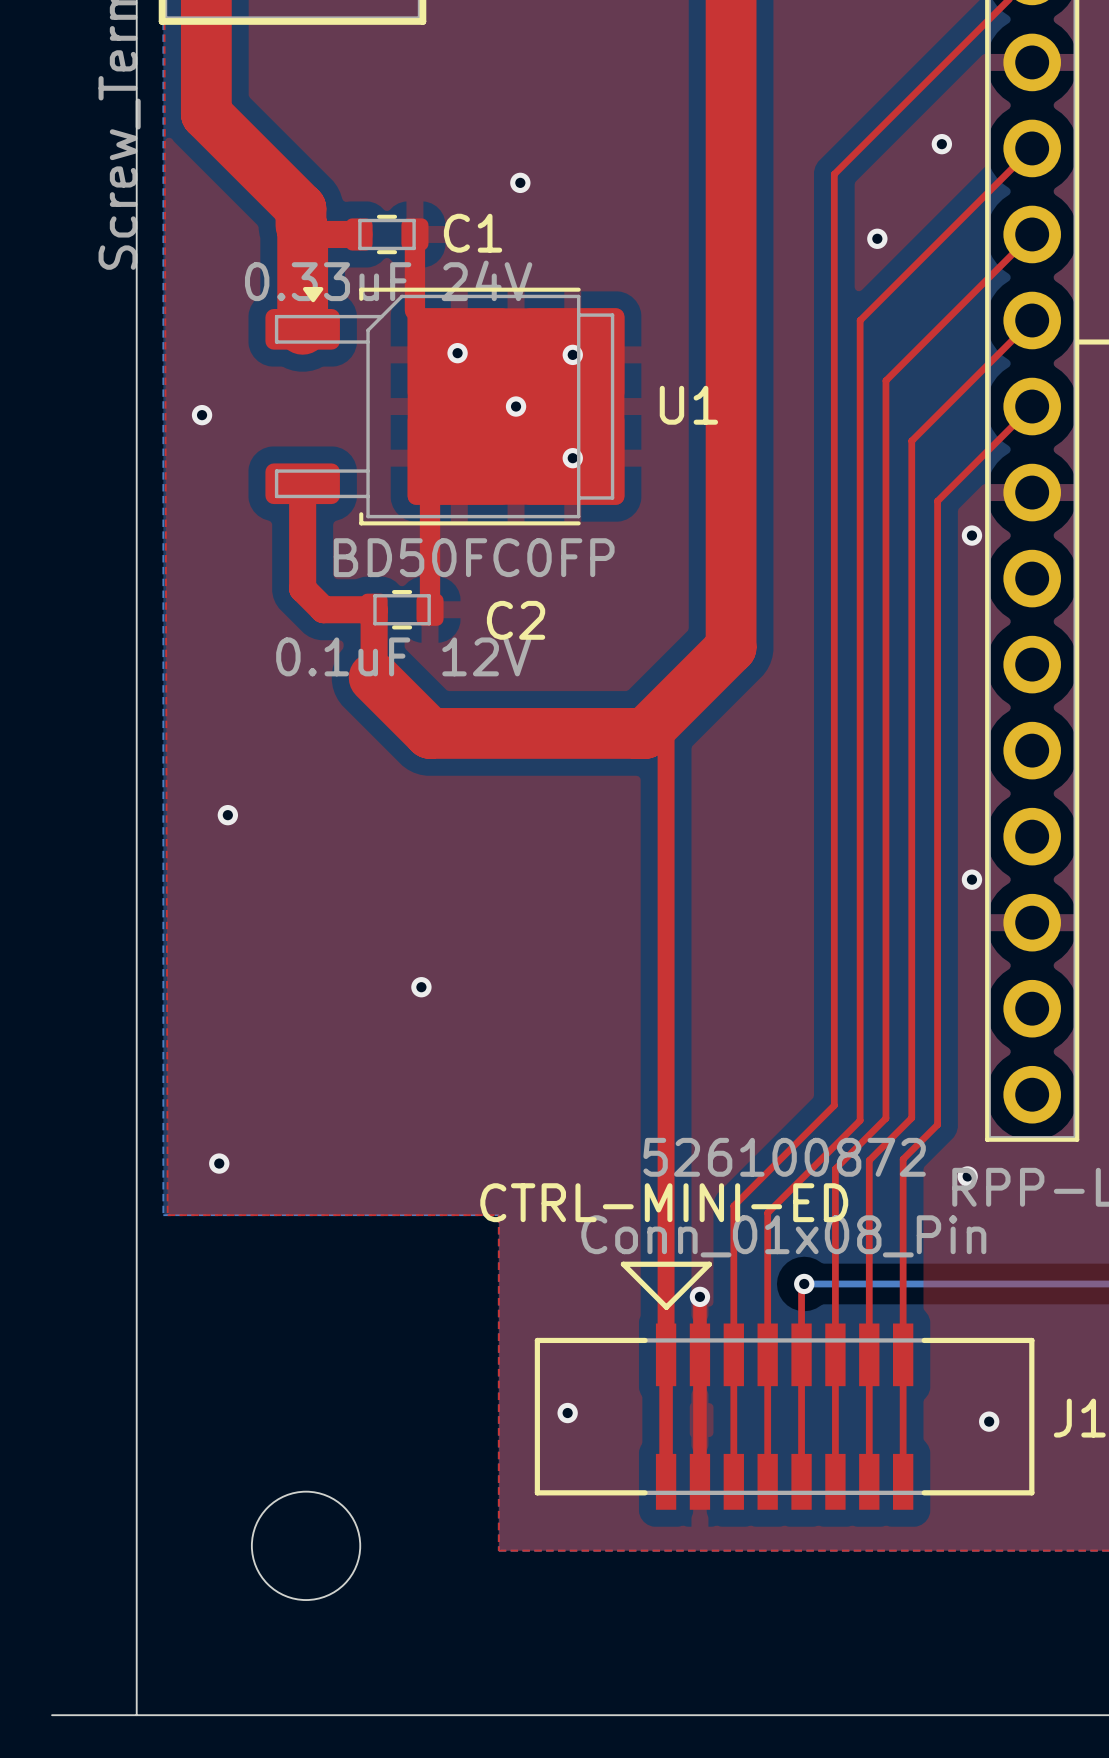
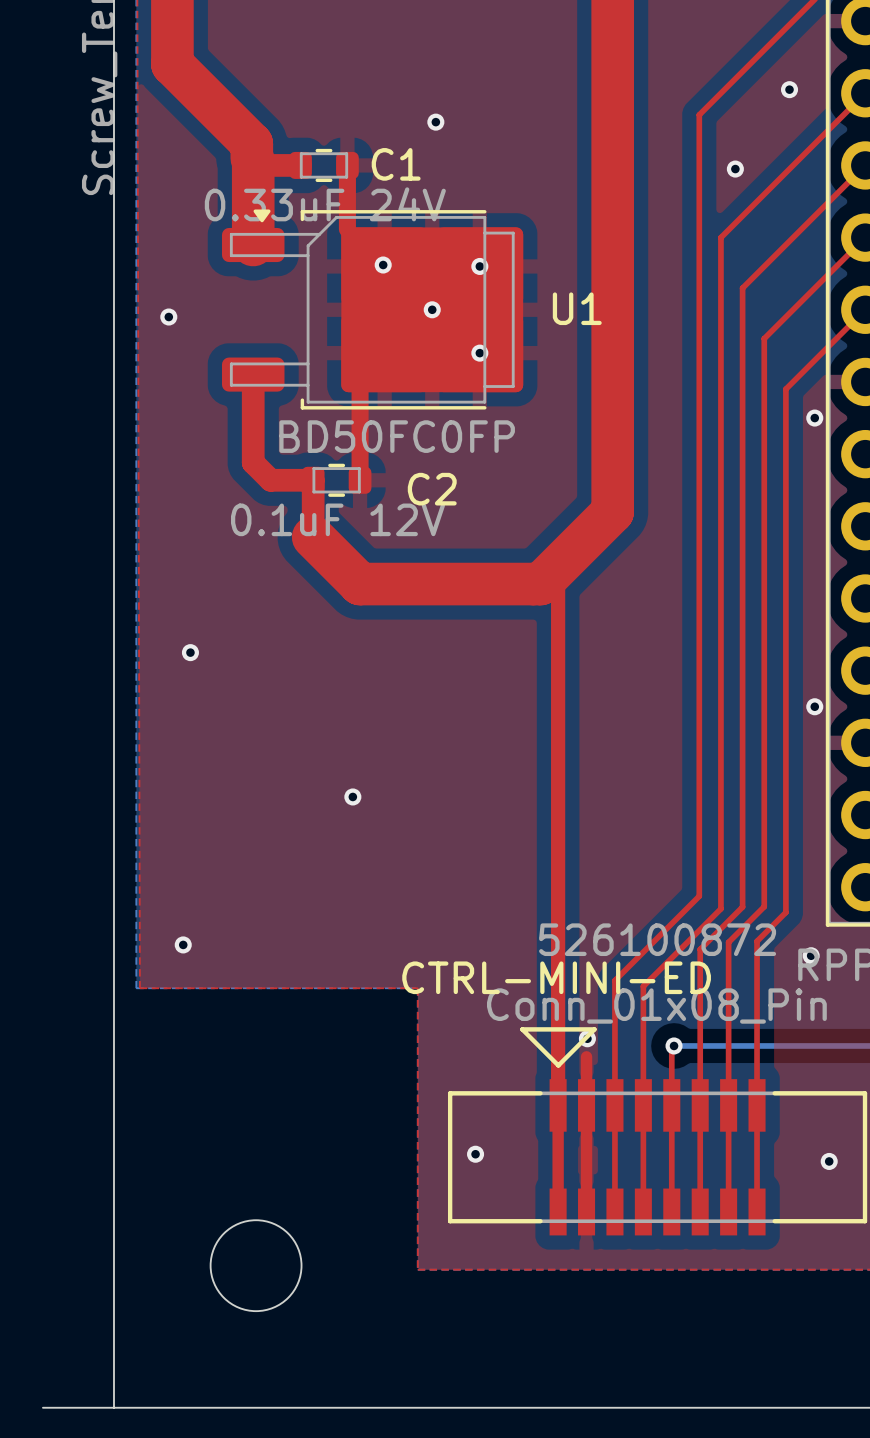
via position: (699, 1296) -> (587, 1038)

